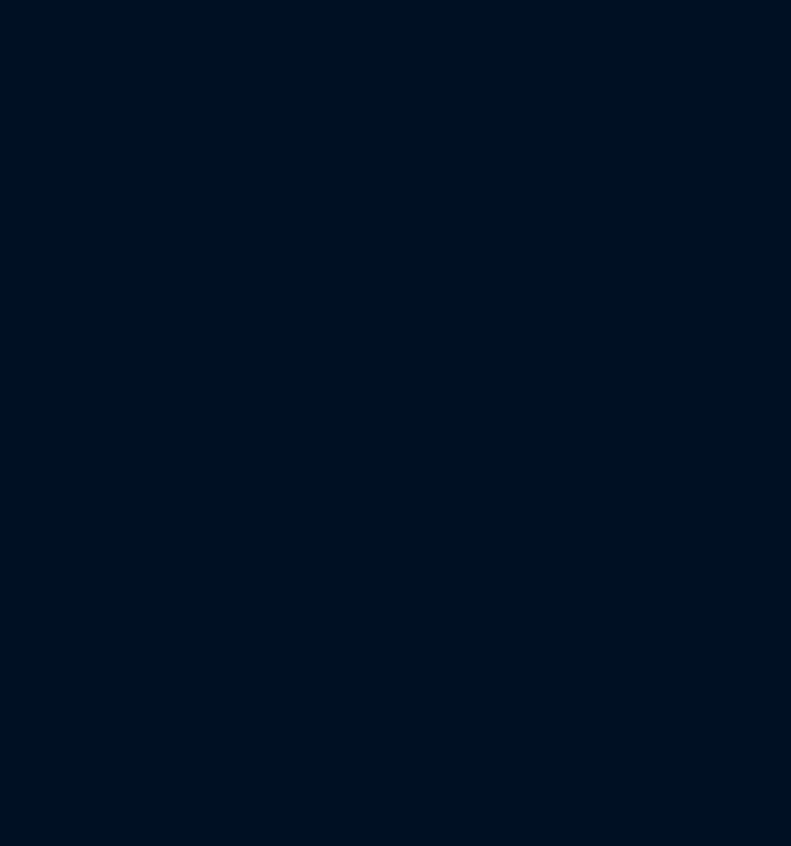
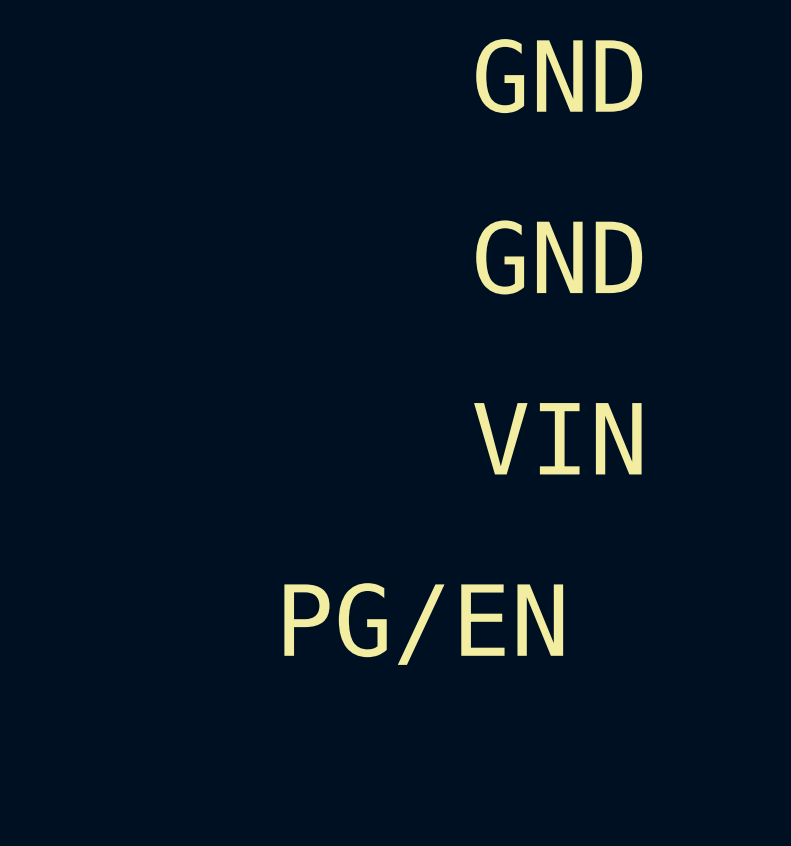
text: none -> GND (559, 76)
text: none -> GND (559, 257)
text: none -> VIN (557, 438)
text: none -> PG/EN (423, 624)

